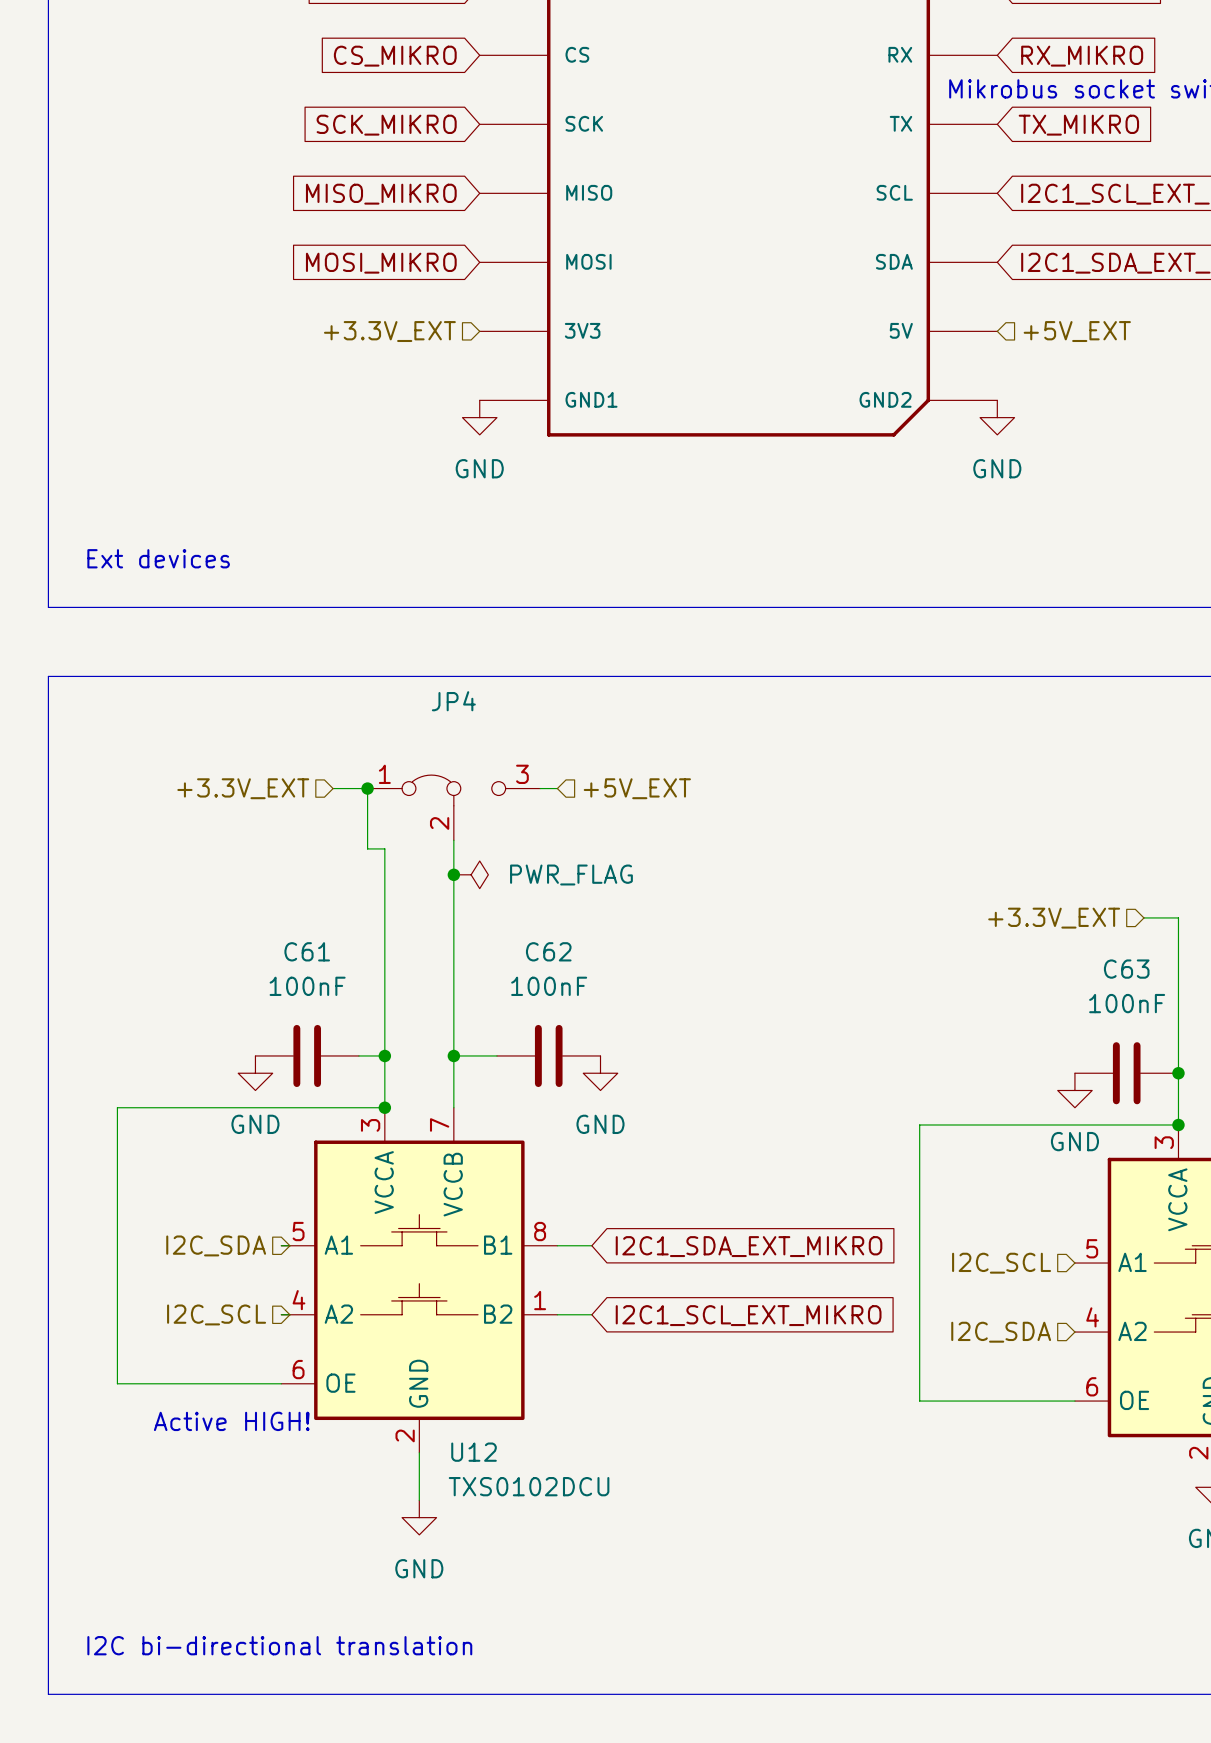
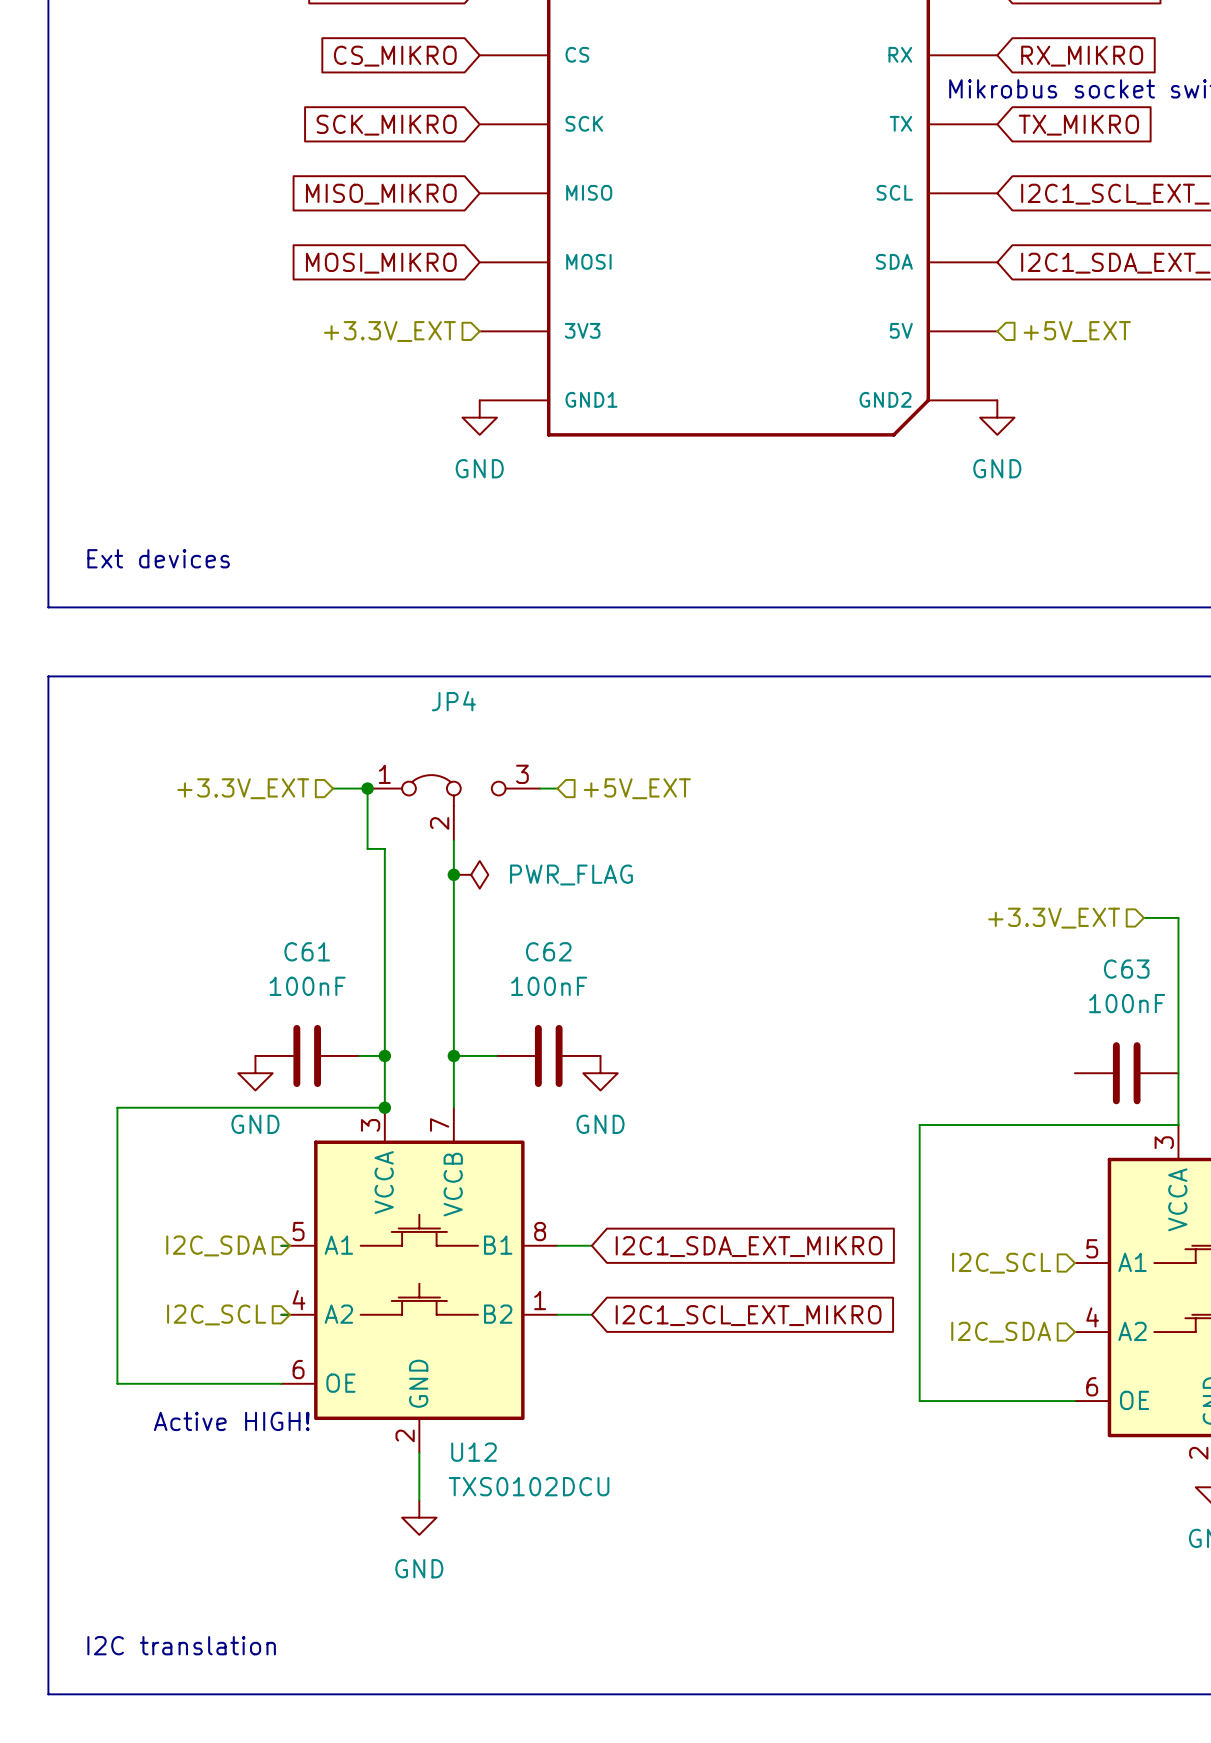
junction: (1178, 1073) -> none
power symbol: GND (1074, 1090) -> none
junction: (1178, 1124) -> none
text: I2C bi-directional translation (279, 1645) -> I2C translation (181, 1645)

